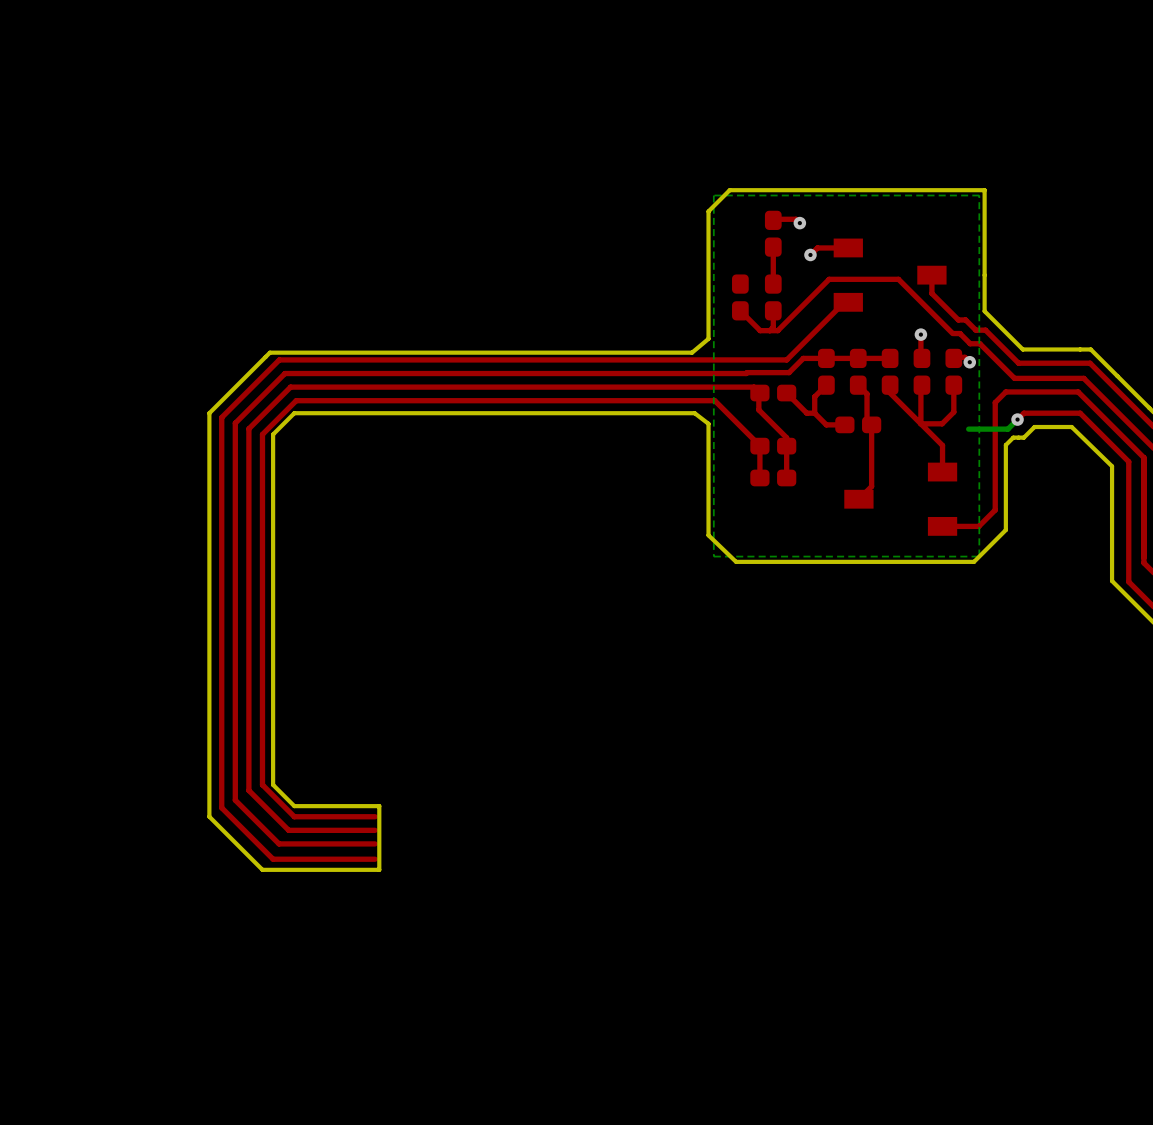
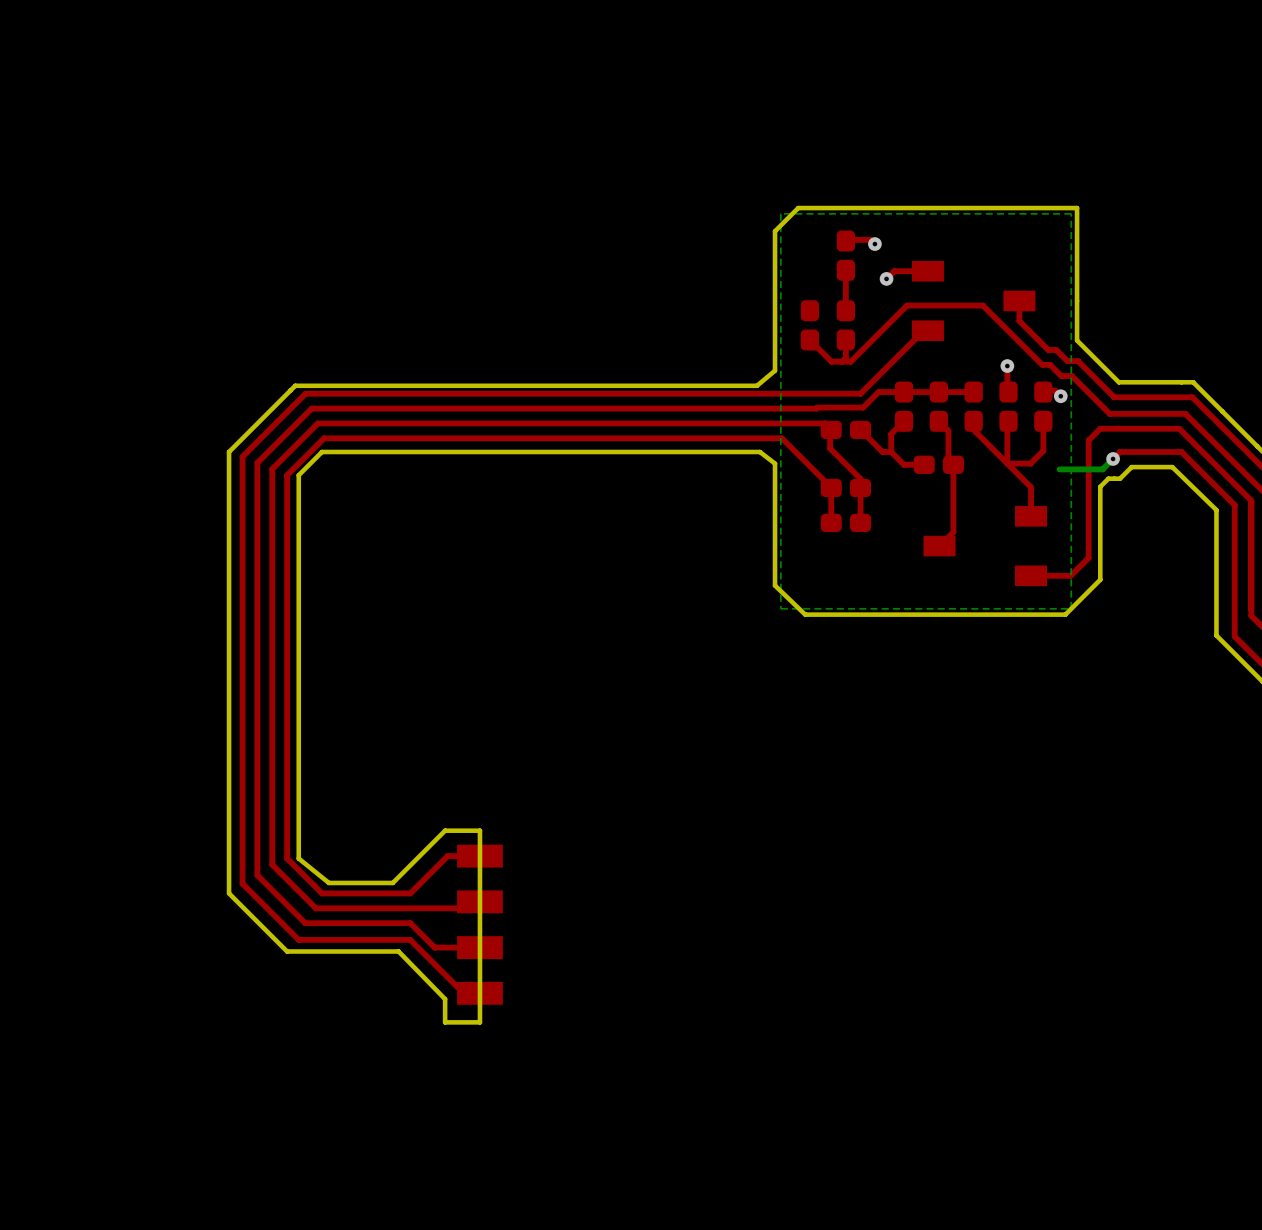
top track: none -> (479, 856) (447, 856) (410, 893)
board edge: (273, 784) (294, 806) (379, 806) (379, 869) (364, 869) -> (298, 858) (328, 882) (392, 882) (445, 830) (479, 830) (479, 1022) (445, 1022) (445, 999) (398, 951)
top track: none -> (479, 901) (473, 908) (410, 908)
top track: none -> (410, 923) (434, 947) (479, 947)
part: none -> (479, 924)
top track: none -> (410, 939) (463, 993) (479, 993)

